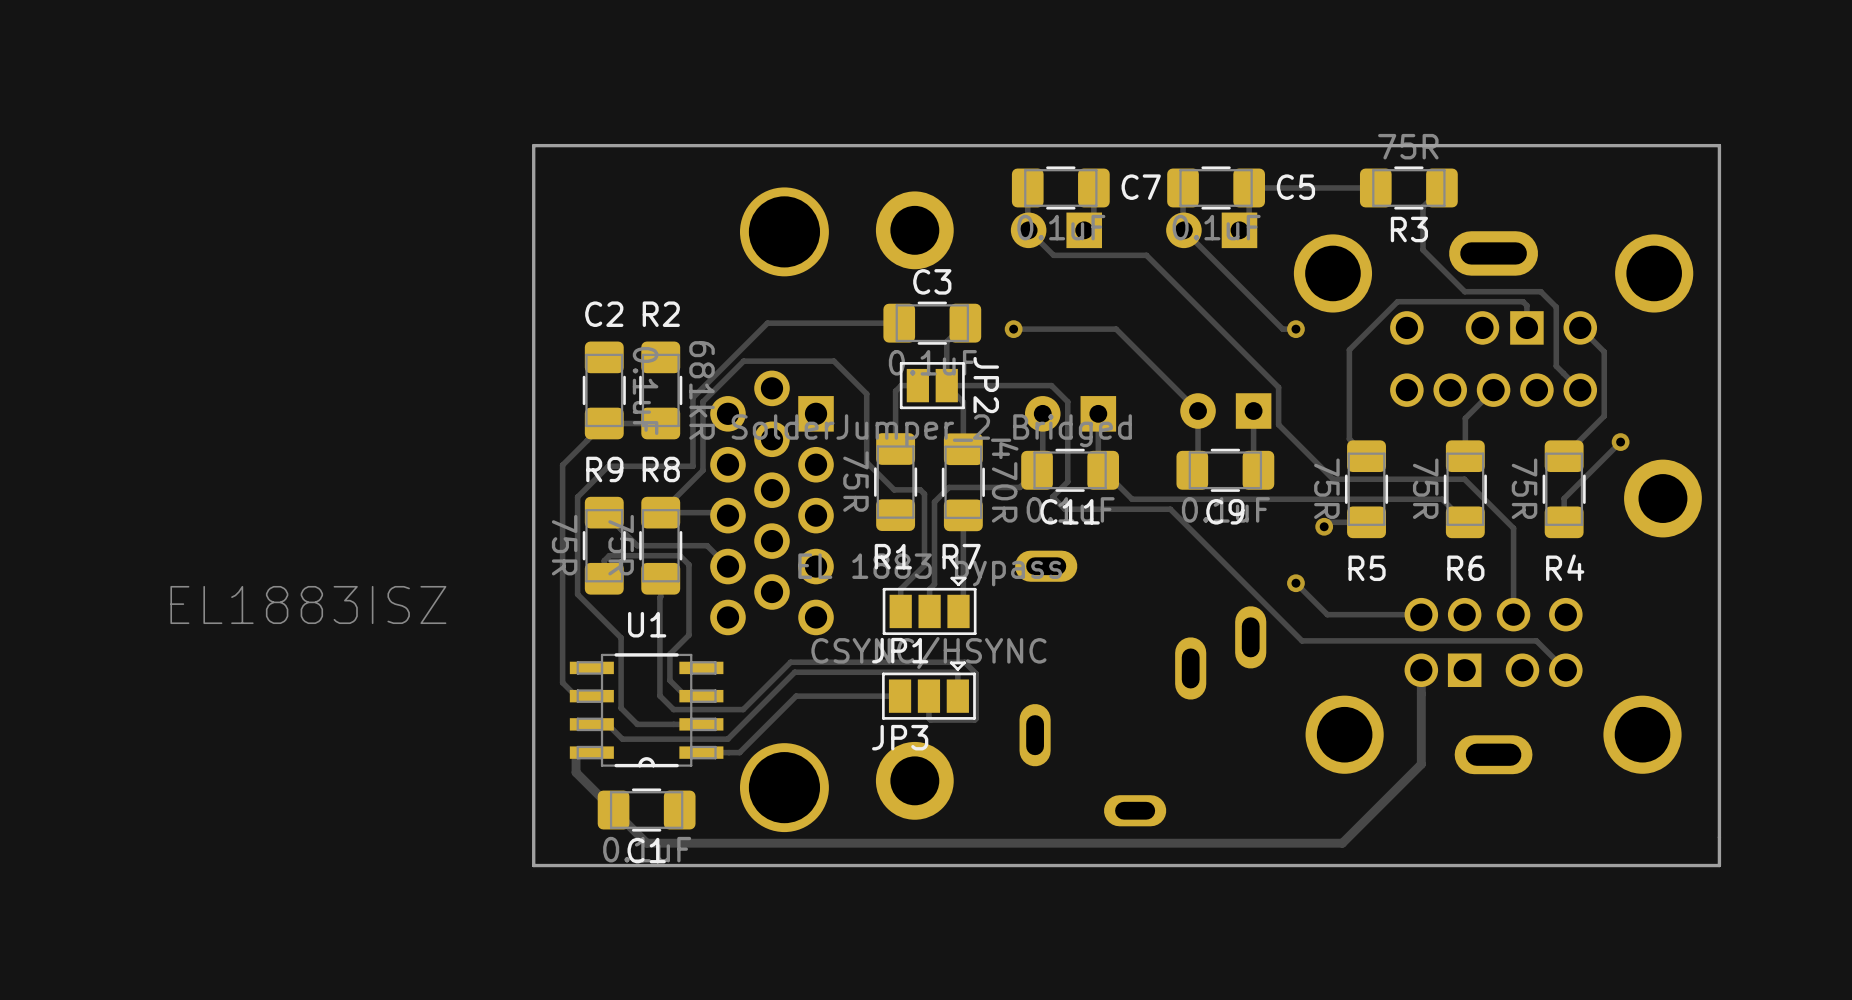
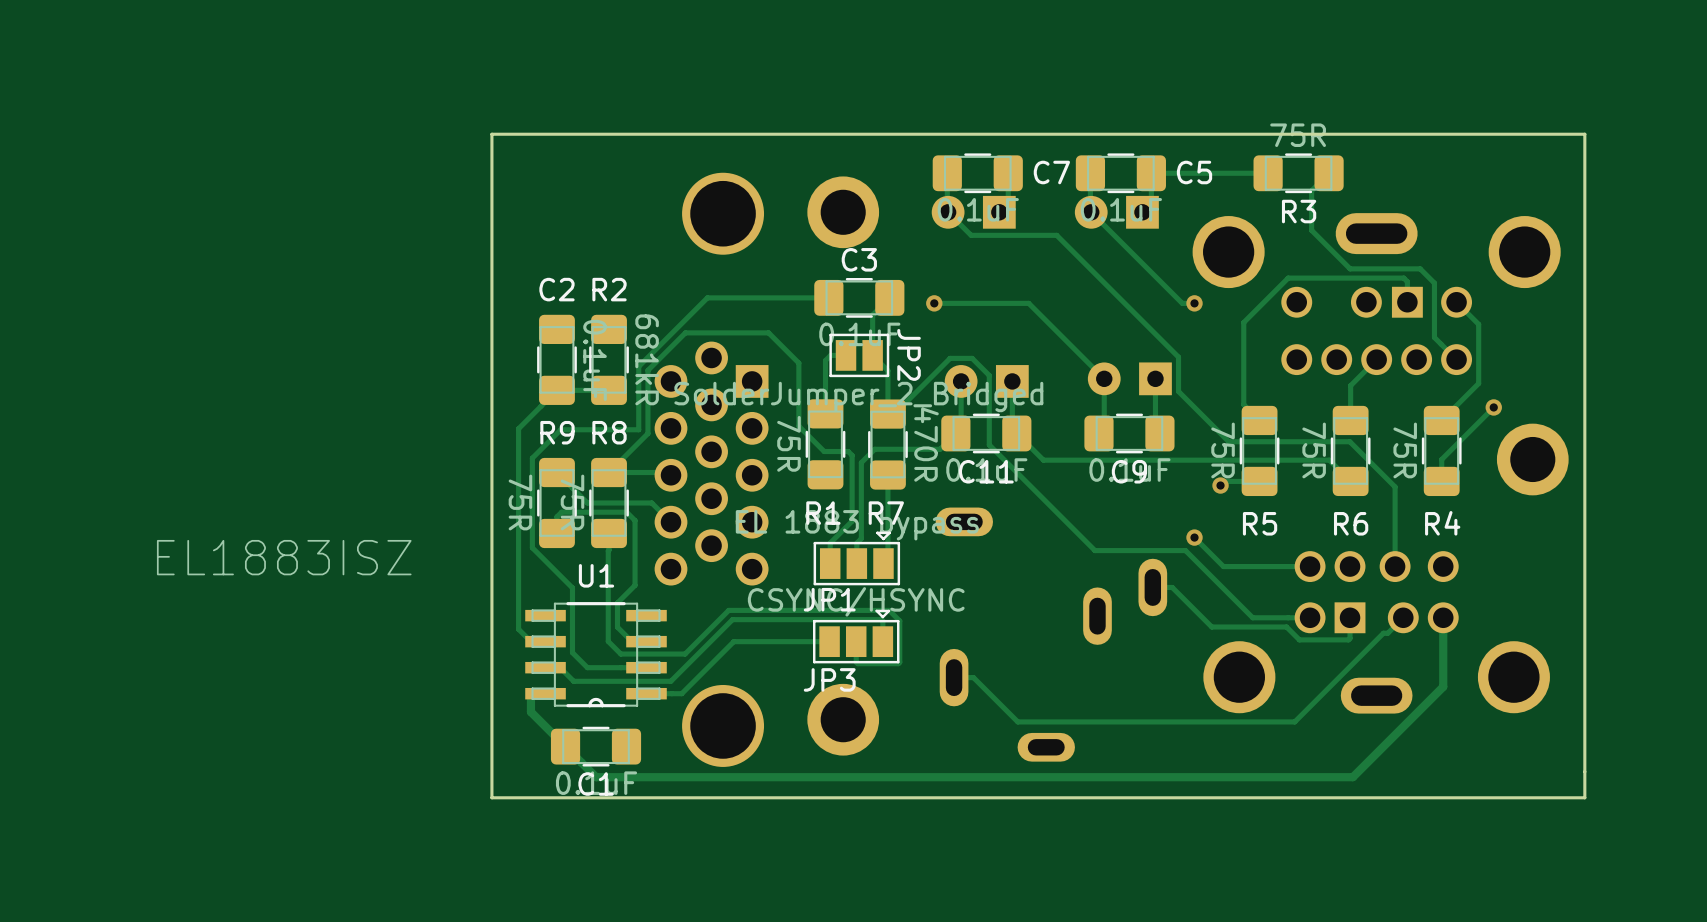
track: (946, 385) (1051, 385) (1054, 388) -> (887, 414) (894, 414) (950, 358) (972, 358)
track: (1067, 401) (1067, 481) (1052, 496) (1064, 509) (1170, 509) (1302, 640) (1536, 640) (1565, 670) -> (984, 370) (989, 375) (989, 444) (1094, 550) (1185, 550) (1252, 617) (1310, 617)
track: none -> (1152, 587) (1172, 587) (1211, 627) (1286, 627) (1299, 639) (1348, 639) (1350, 617)
track: (1421, 670) (1421, 764) (1342, 843) -> (1443, 617) (1443, 686) (1352, 777) (1237, 777)
track: none -> (1403, 617) (1387, 633) (1383, 633) (1294, 721) (1017, 721) (973, 677) (954, 677)

